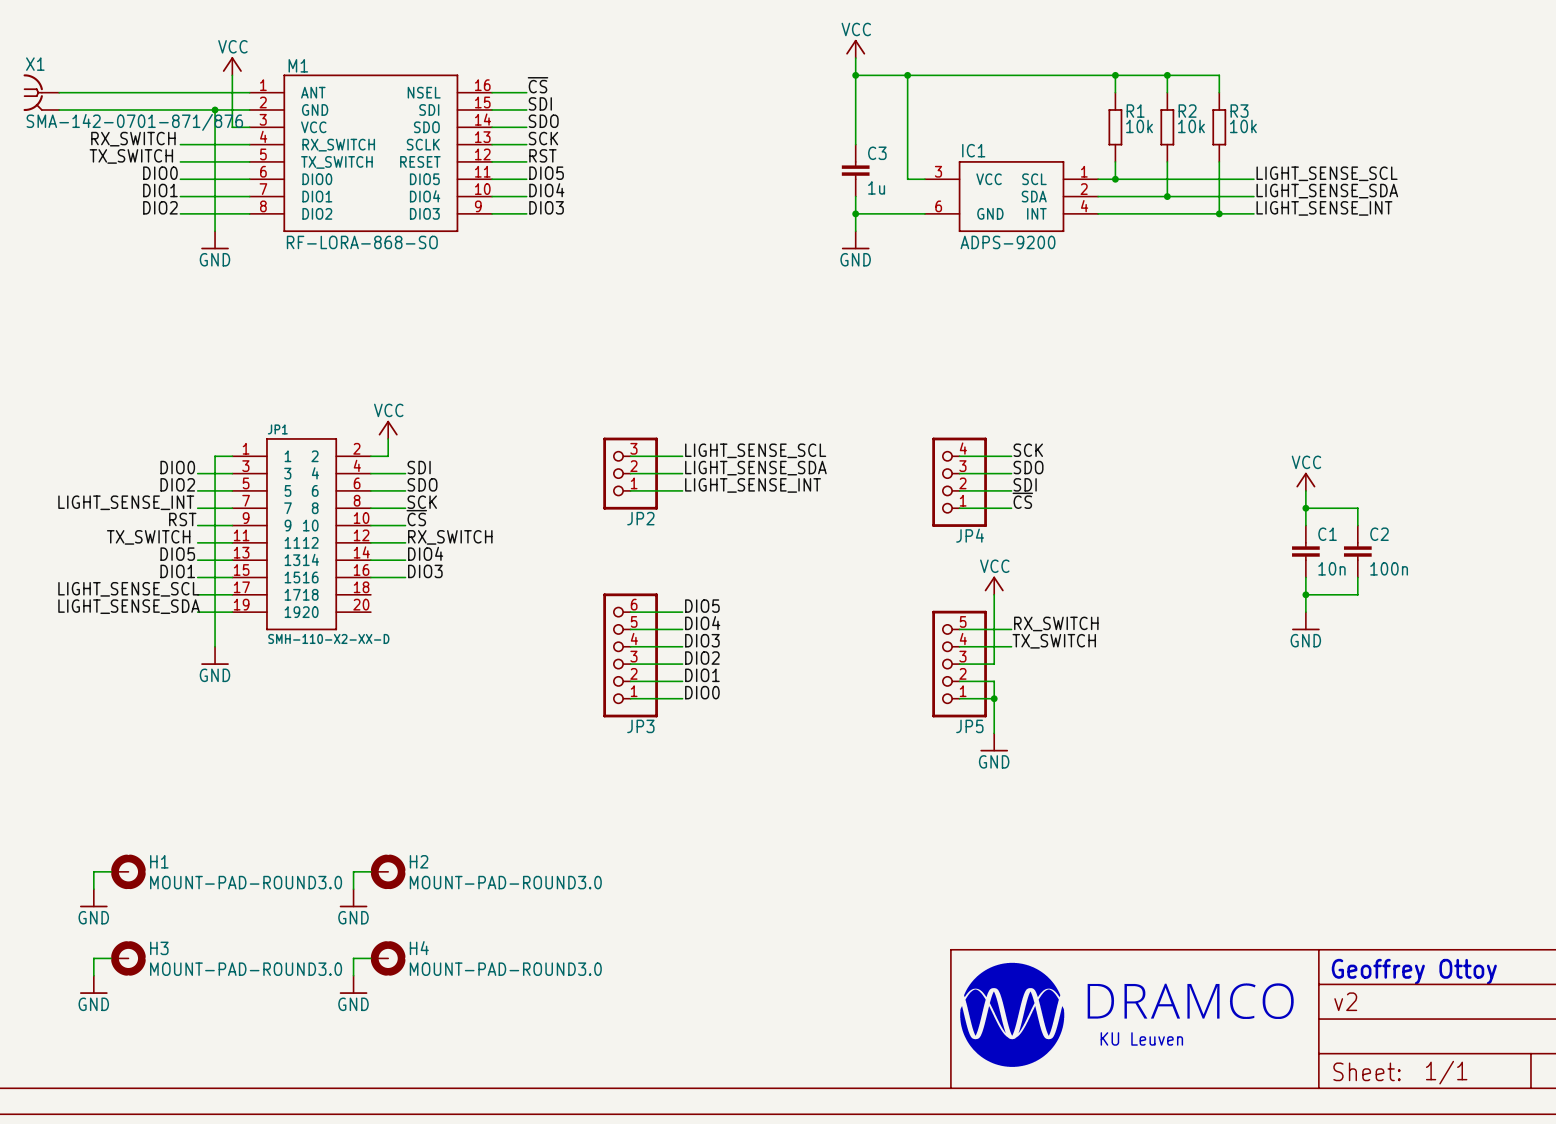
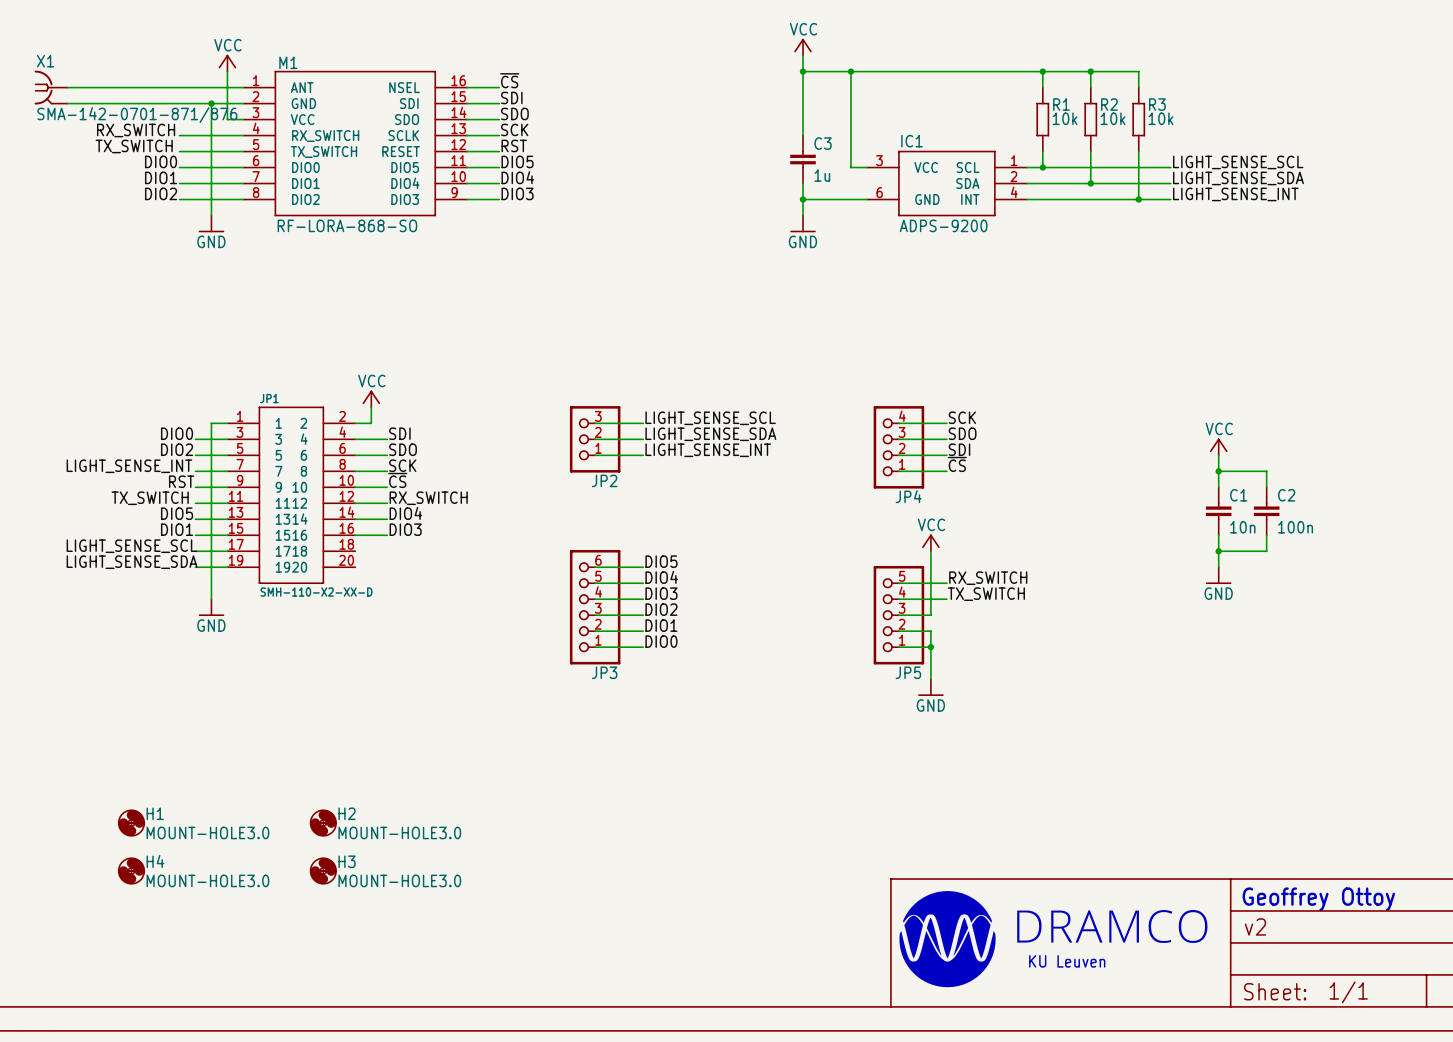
H1 symbol: [111, 854, 146, 890] -> [118, 810, 145, 837]
H2 symbol: [370, 854, 406, 890] -> [310, 810, 337, 837]
wire: (111, 871) (93, 871) (93, 889) -> none
wire: (370, 871) (353, 871) (353, 889) -> none
H1 value: MOUNT-PAD-ROUND3.0 (246, 882) -> MOUNT-HOLE3.0 (207, 832)
H2 value: MOUNT-PAD-ROUND3.0 (505, 882) -> MOUNT-HOLE3.0 (399, 832)
power symbol: GND (93, 898) -> none
power symbol: GND (353, 898) -> none
H3 symbol: [111, 941, 146, 976] -> [310, 858, 337, 884]
H4 symbol: [370, 941, 406, 976] -> [118, 858, 145, 884]
wire: (111, 958) (93, 958) (93, 975) -> none
wire: (370, 958) (353, 958) (353, 975) -> none
H3 value: MOUNT-PAD-ROUND3.0 (246, 969) -> MOUNT-HOLE3.0 (399, 880)
H4 value: MOUNT-PAD-ROUND3.0 (505, 969) -> MOUNT-HOLE3.0 (207, 880)
power symbol: GND (93, 984) -> none
power symbol: GND (353, 984) -> none

